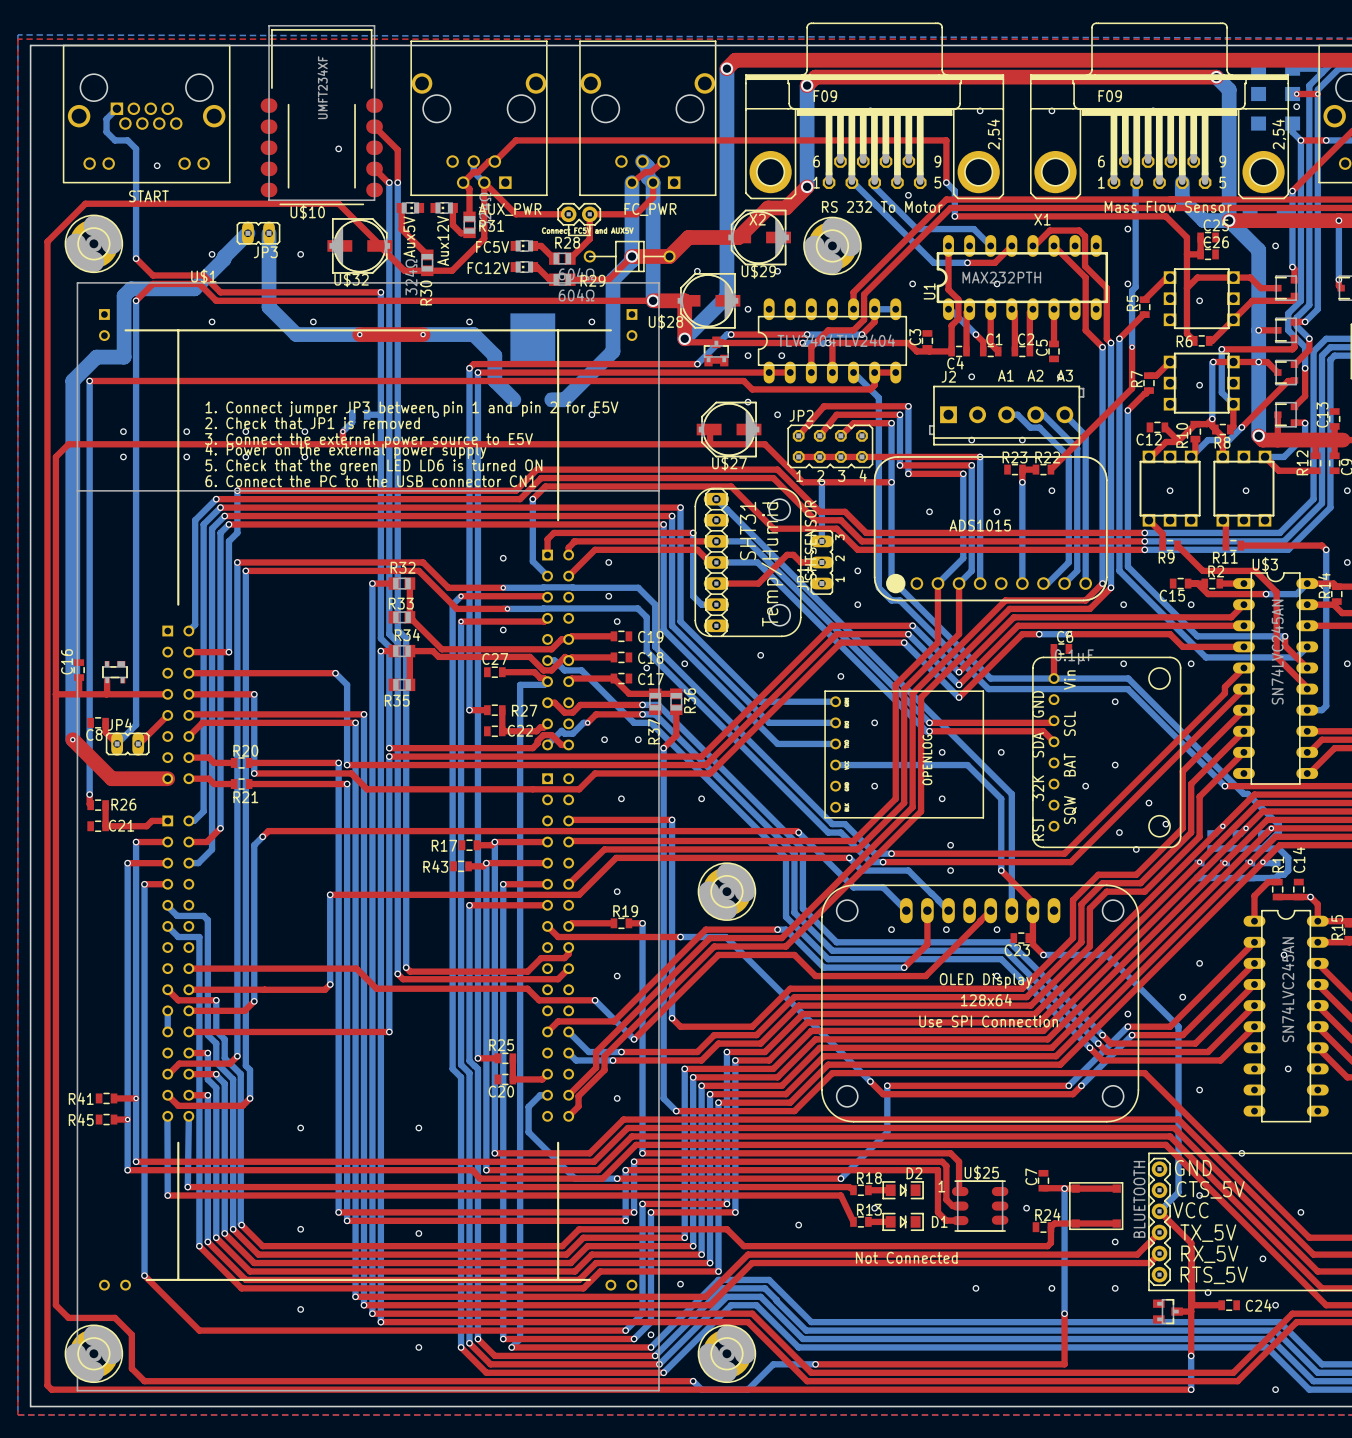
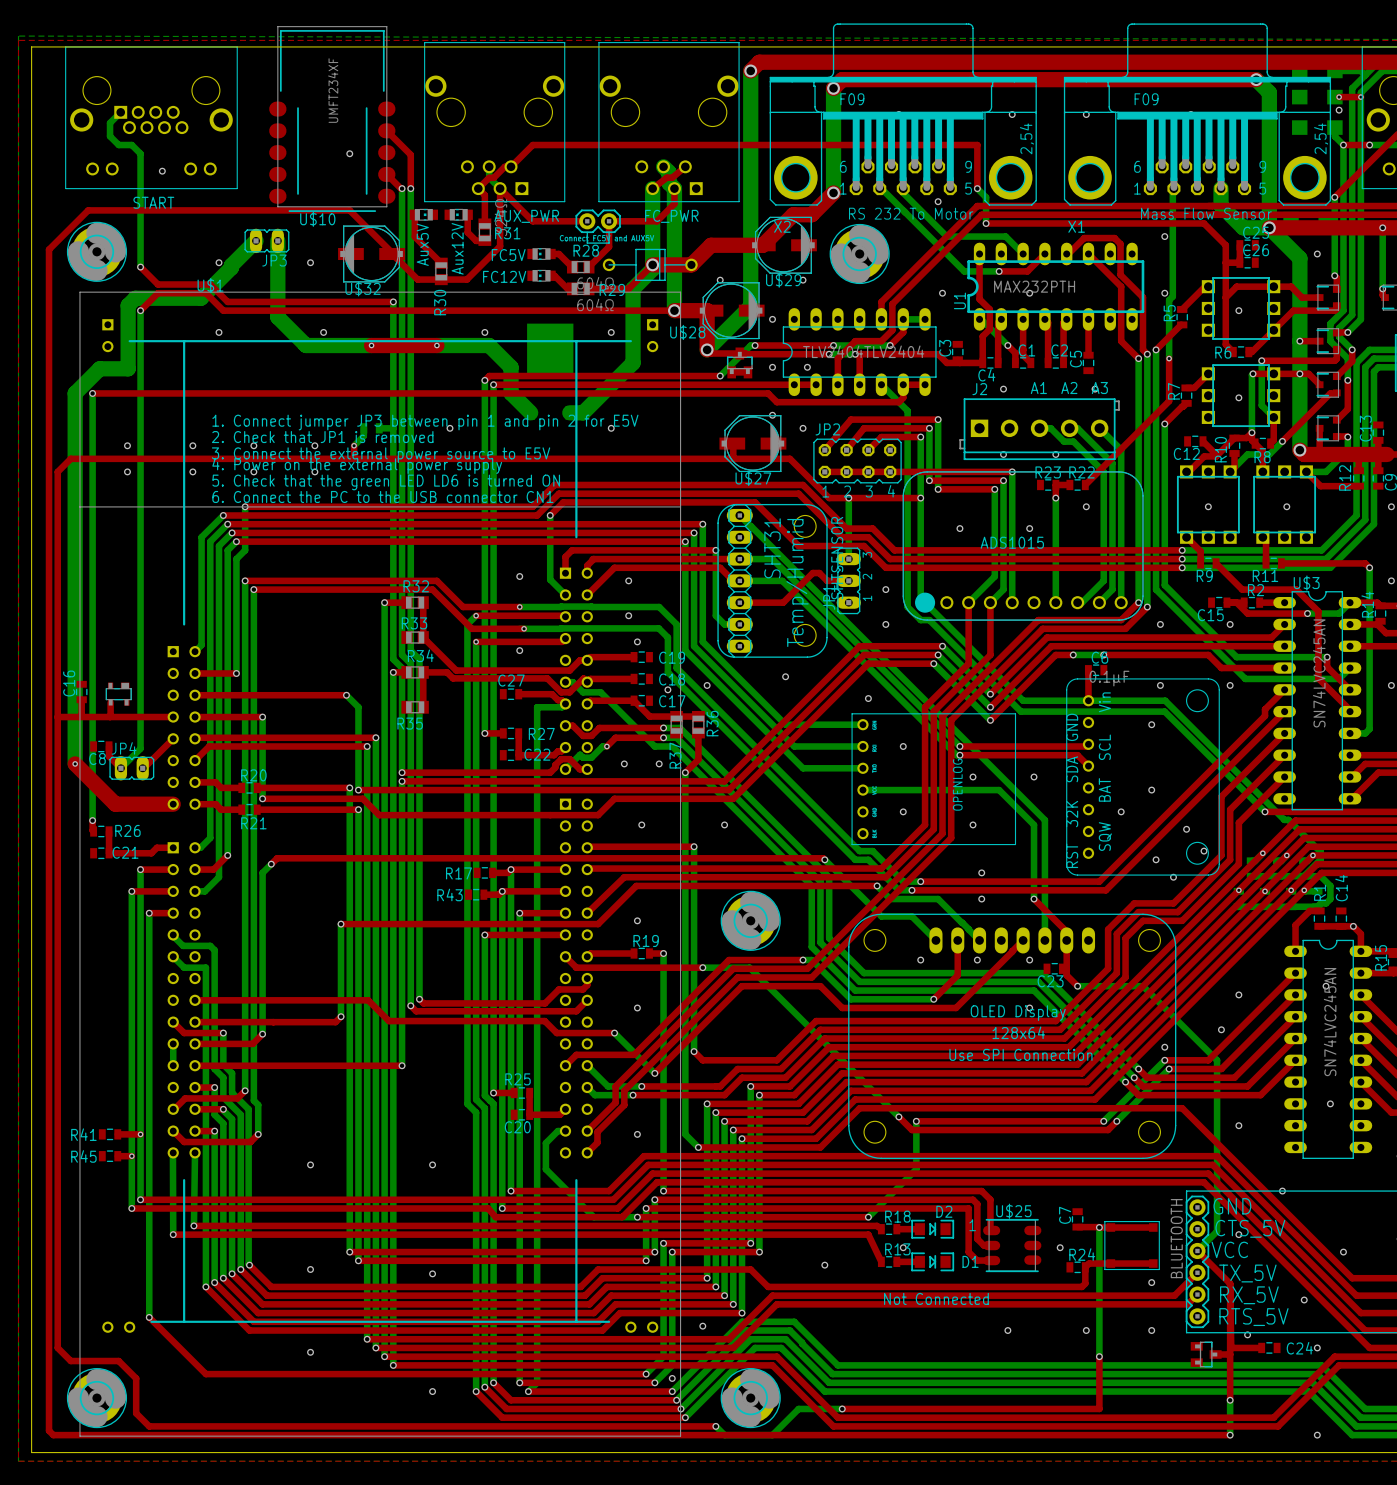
R30 value: 324Ω (411, 277) -> none

